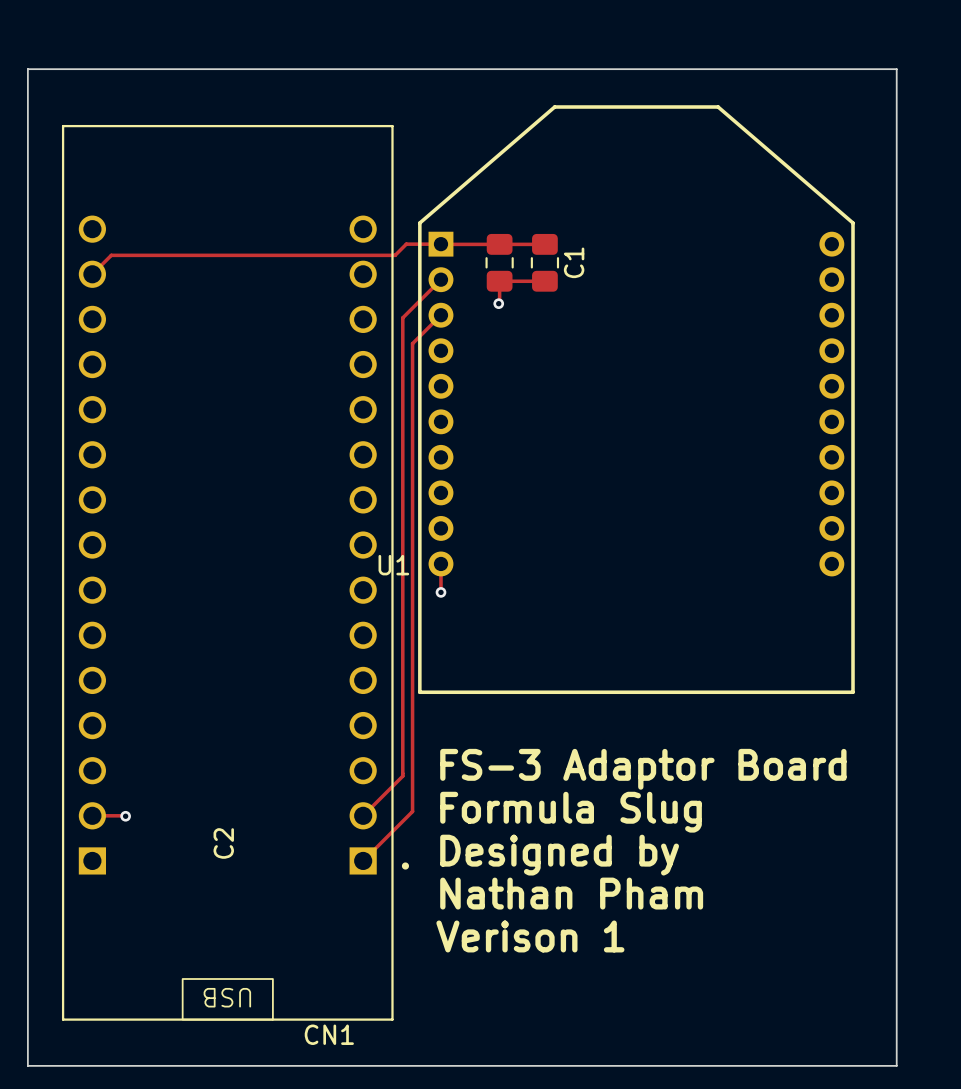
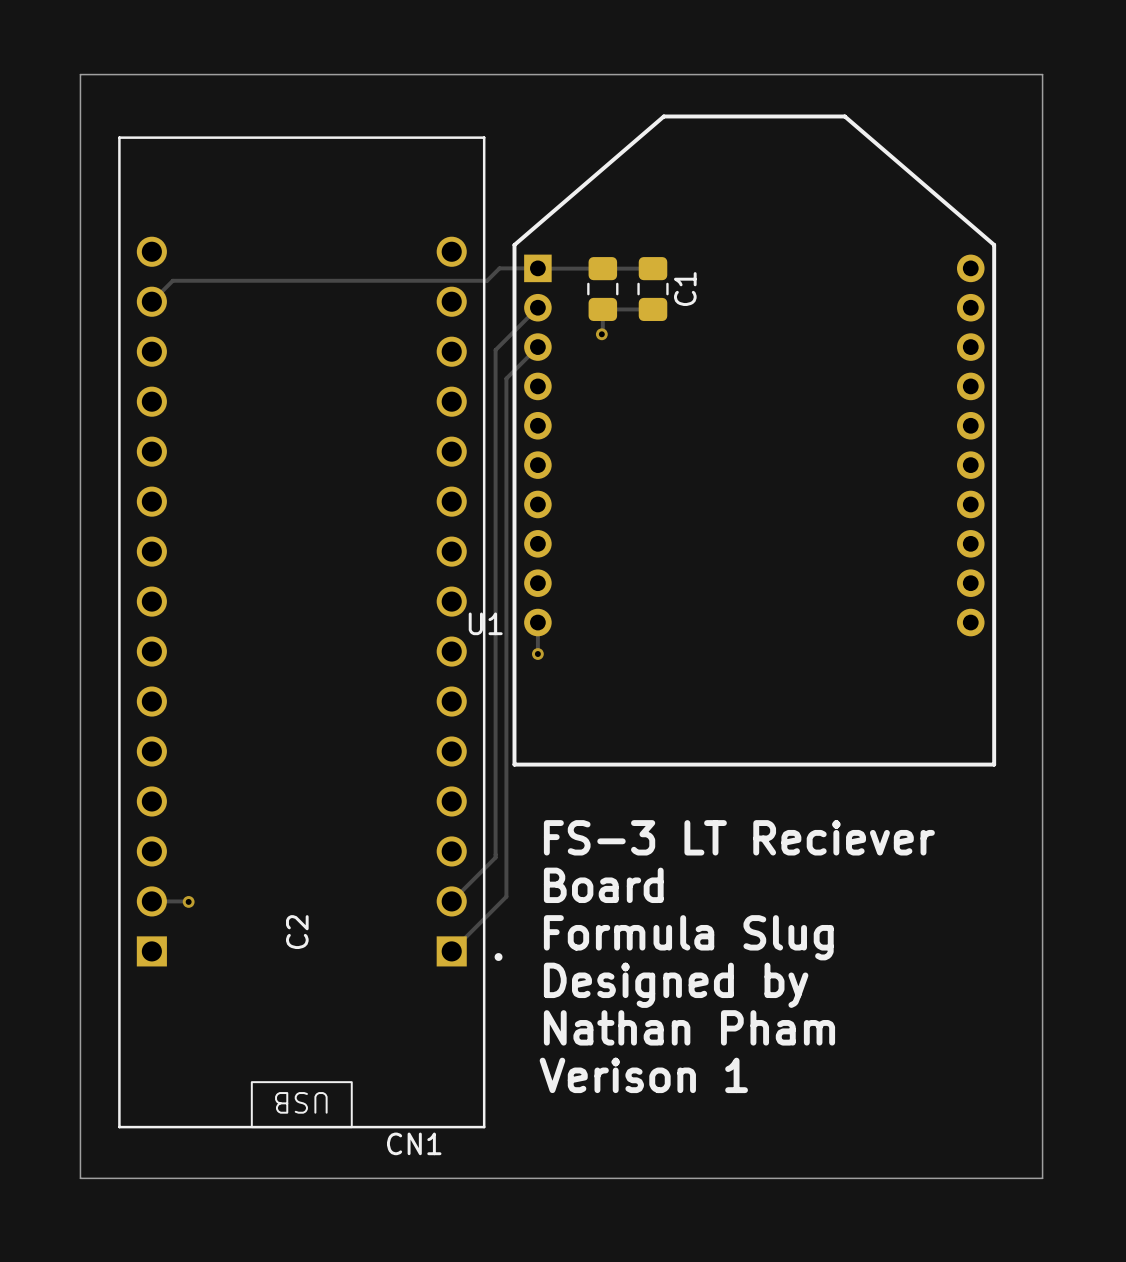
text: FS-3 Adaptor Board (643, 769) -> FS-3 LT Reciever (739, 837)
text: none -> Board (603, 885)
text position: Formula Slug (571, 812) -> Formula Slug (688, 937)
text position: Designed by (559, 855) -> Designed by (676, 985)
text position: Nathan Pham (571, 893) -> Nathan Pham (689, 1027)
text position: Verison 1 (530, 936) -> Verison 1 (643, 1075)

